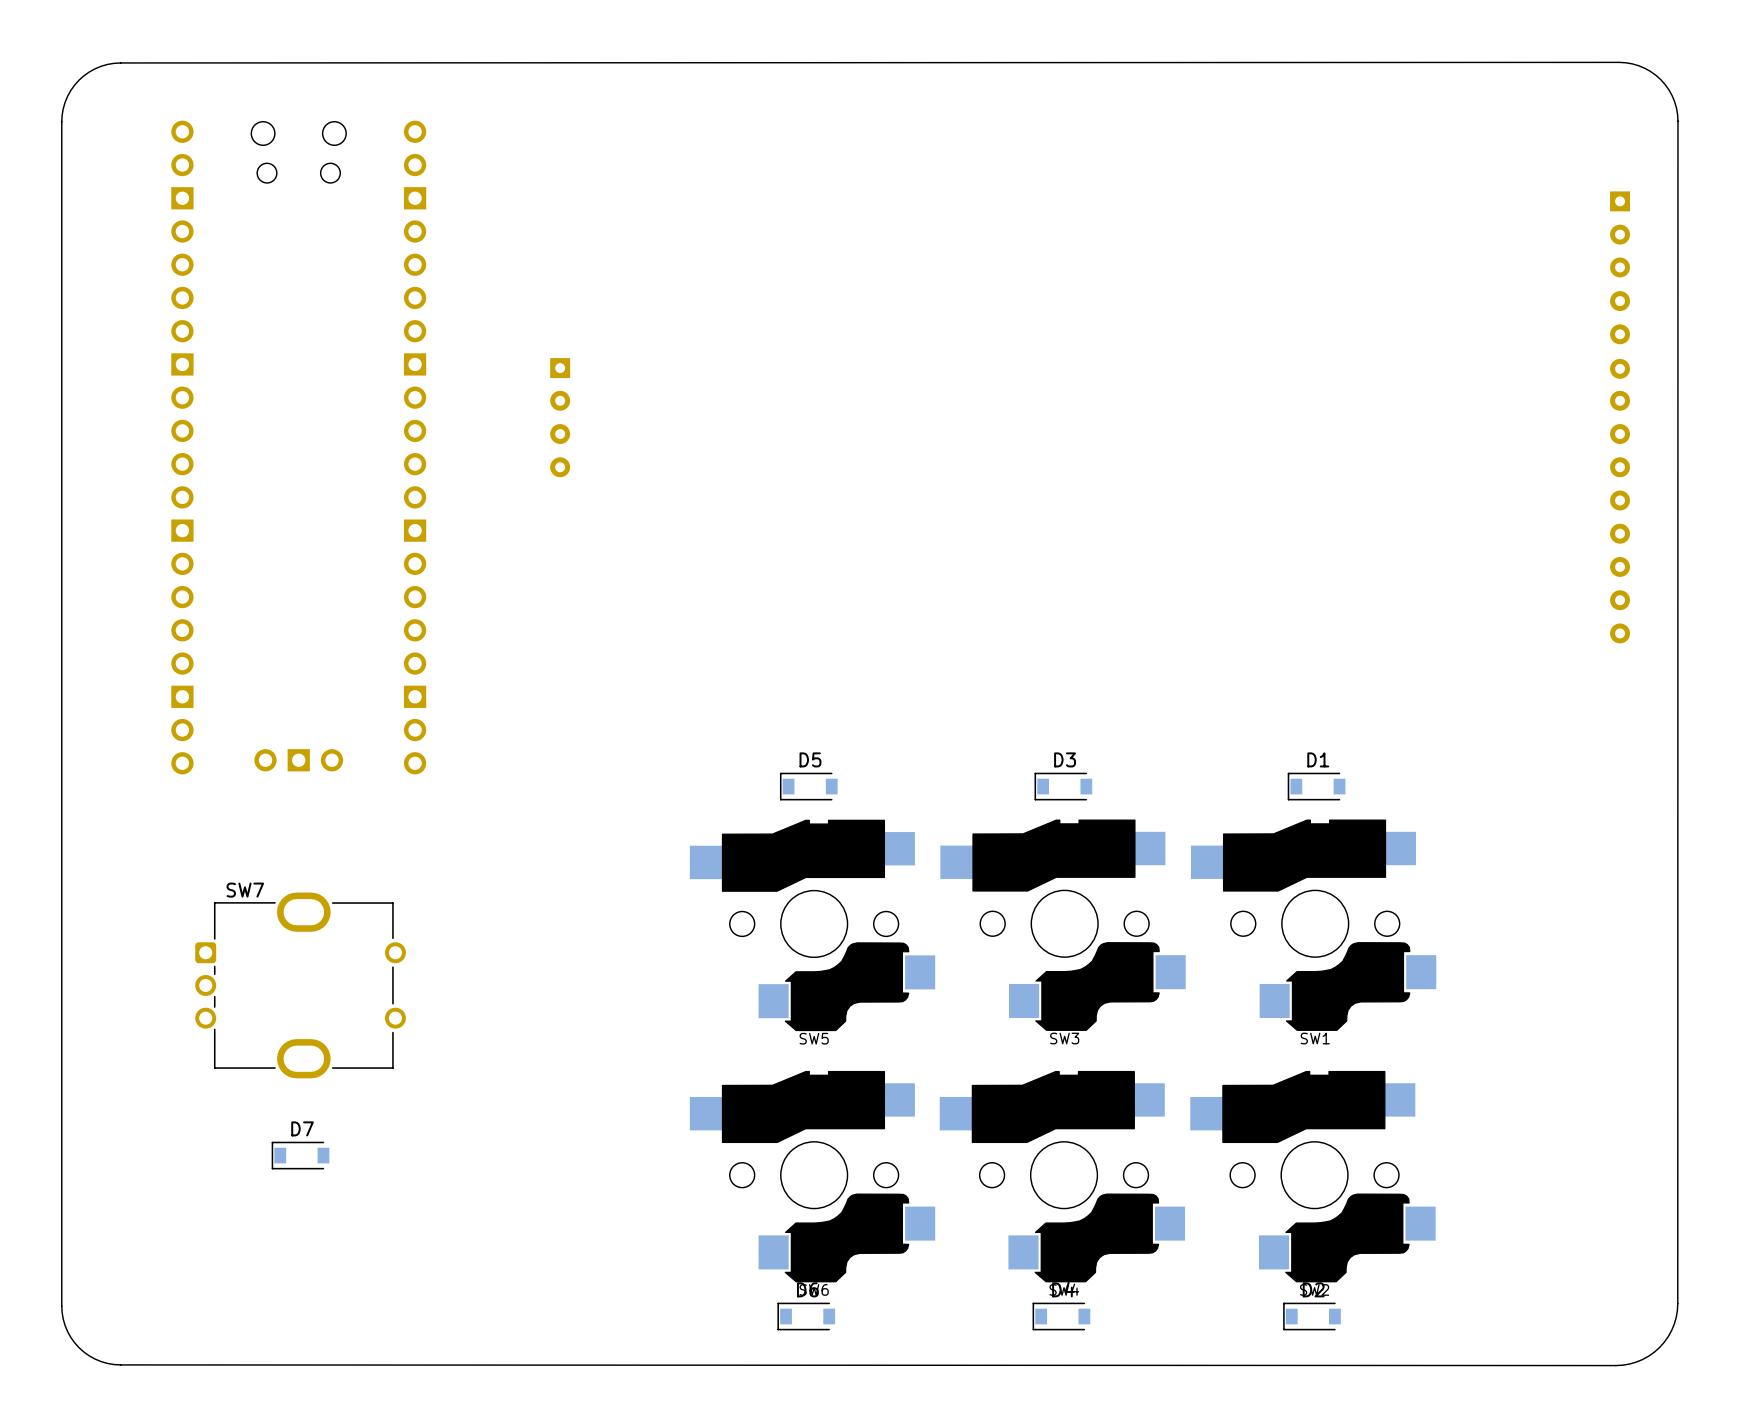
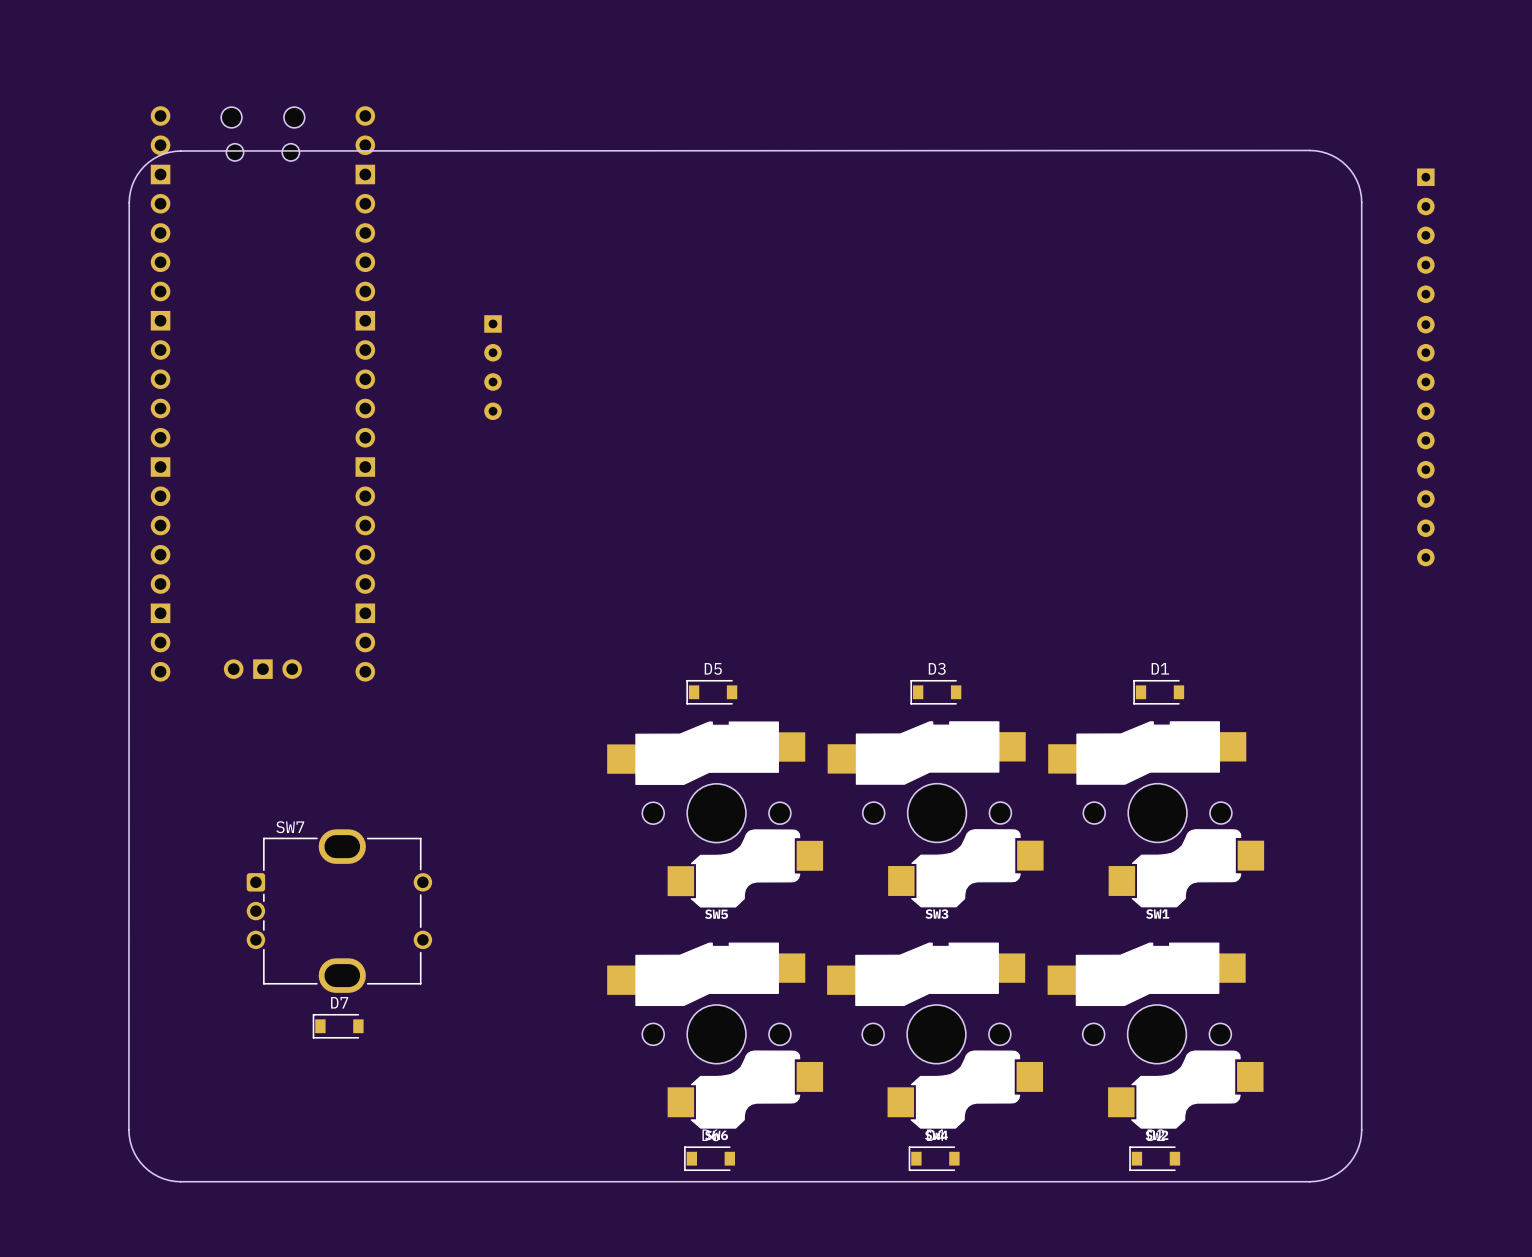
board edge: (1619, 62) (120, 62) (101, 66) (83, 75) (67, 96) (61, 121) (61, 1306) (65, 1325) (74, 1342) (95, 1359) (120, 1364) (1615, 1365) (1636, 1362) (1654, 1352) (1664, 1342) (1671, 1330) (1676, 1317) (1677, 1303) (1677, 121) (1672, 95) (1660, 79) (1644, 68) (1619, 62) -> (1309, 150) (1332, 155) (1346, 165) (1356, 179) (1361, 202) (1361, 1129) (1356, 1152) (1342, 1170) (1326, 1178) (1309, 1181) (180, 1181) (158, 1176) (140, 1162) (131, 1147) (128, 1129) (129, 202) (134, 180) (148, 162) (163, 153) (181, 151) (1309, 150)
SW7 position: (300, 985) -> (339, 911)
D7 position: (300, 1155) -> (338, 1026)

